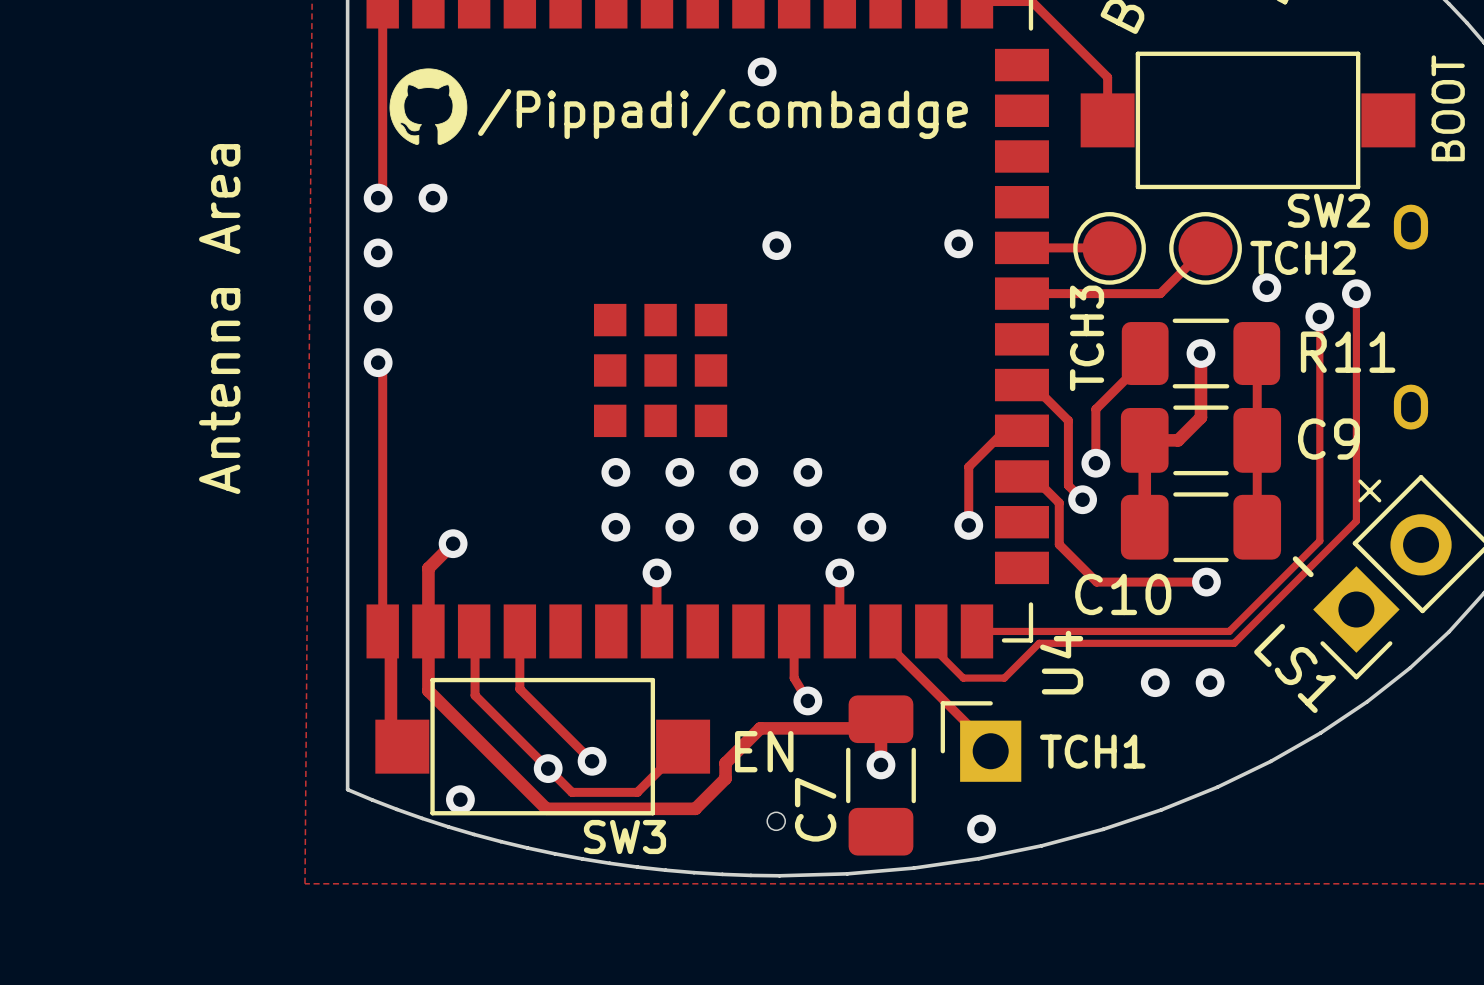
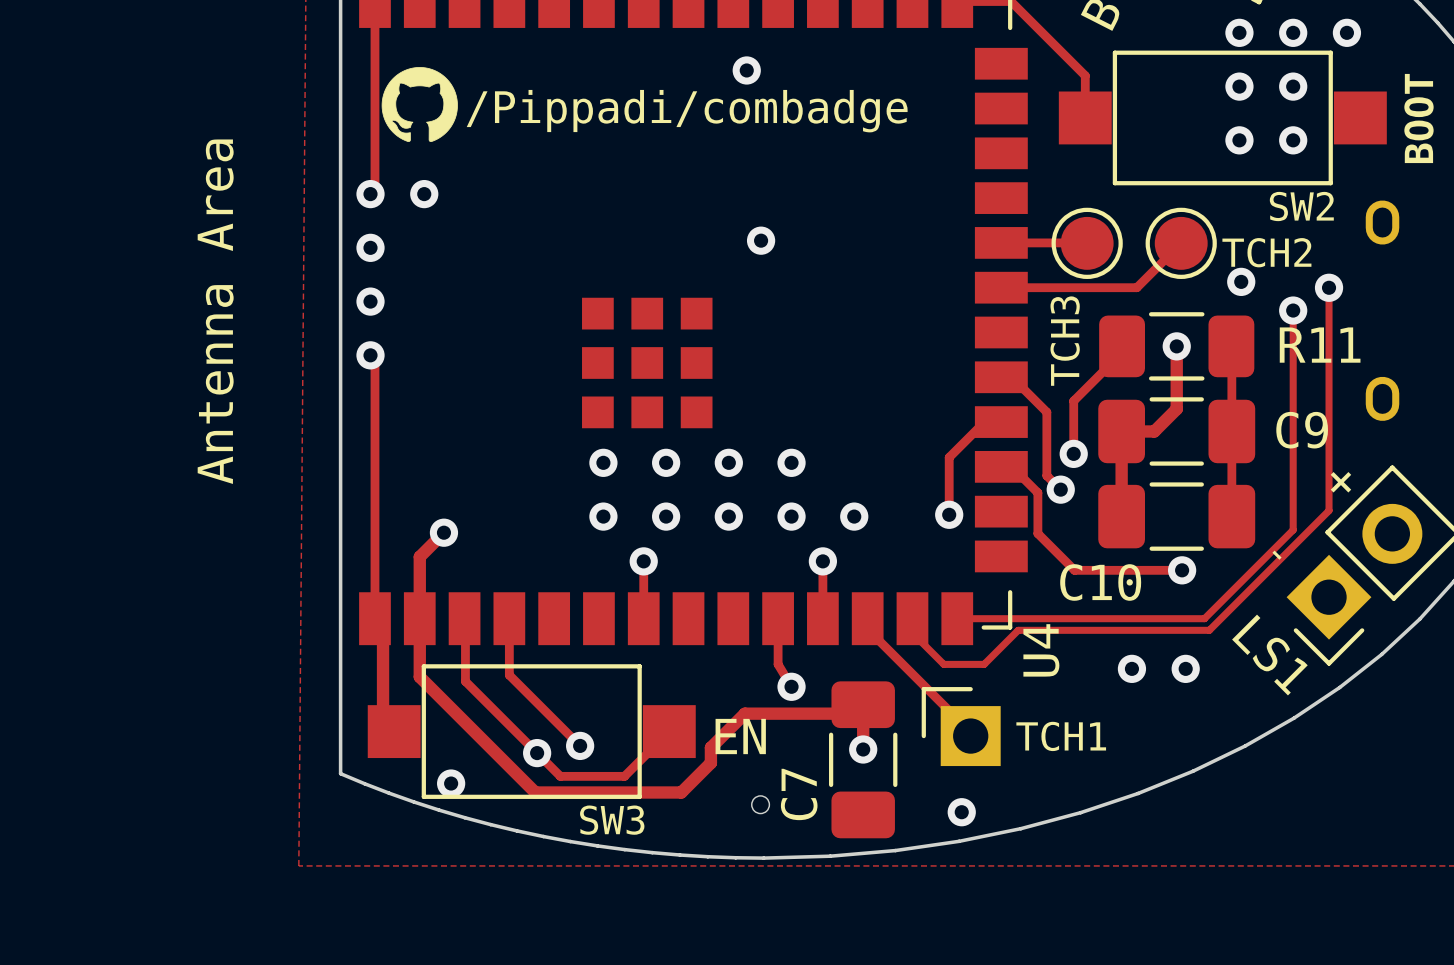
via: none -> (1239, 32)
via: none -> (1293, 32)
via: none -> (1346, 32)
via: none -> (1239, 86)
via: none -> (1293, 86)
via: none -> (1239, 140)
via: none -> (1293, 140)
via: (958, 243) -> none

